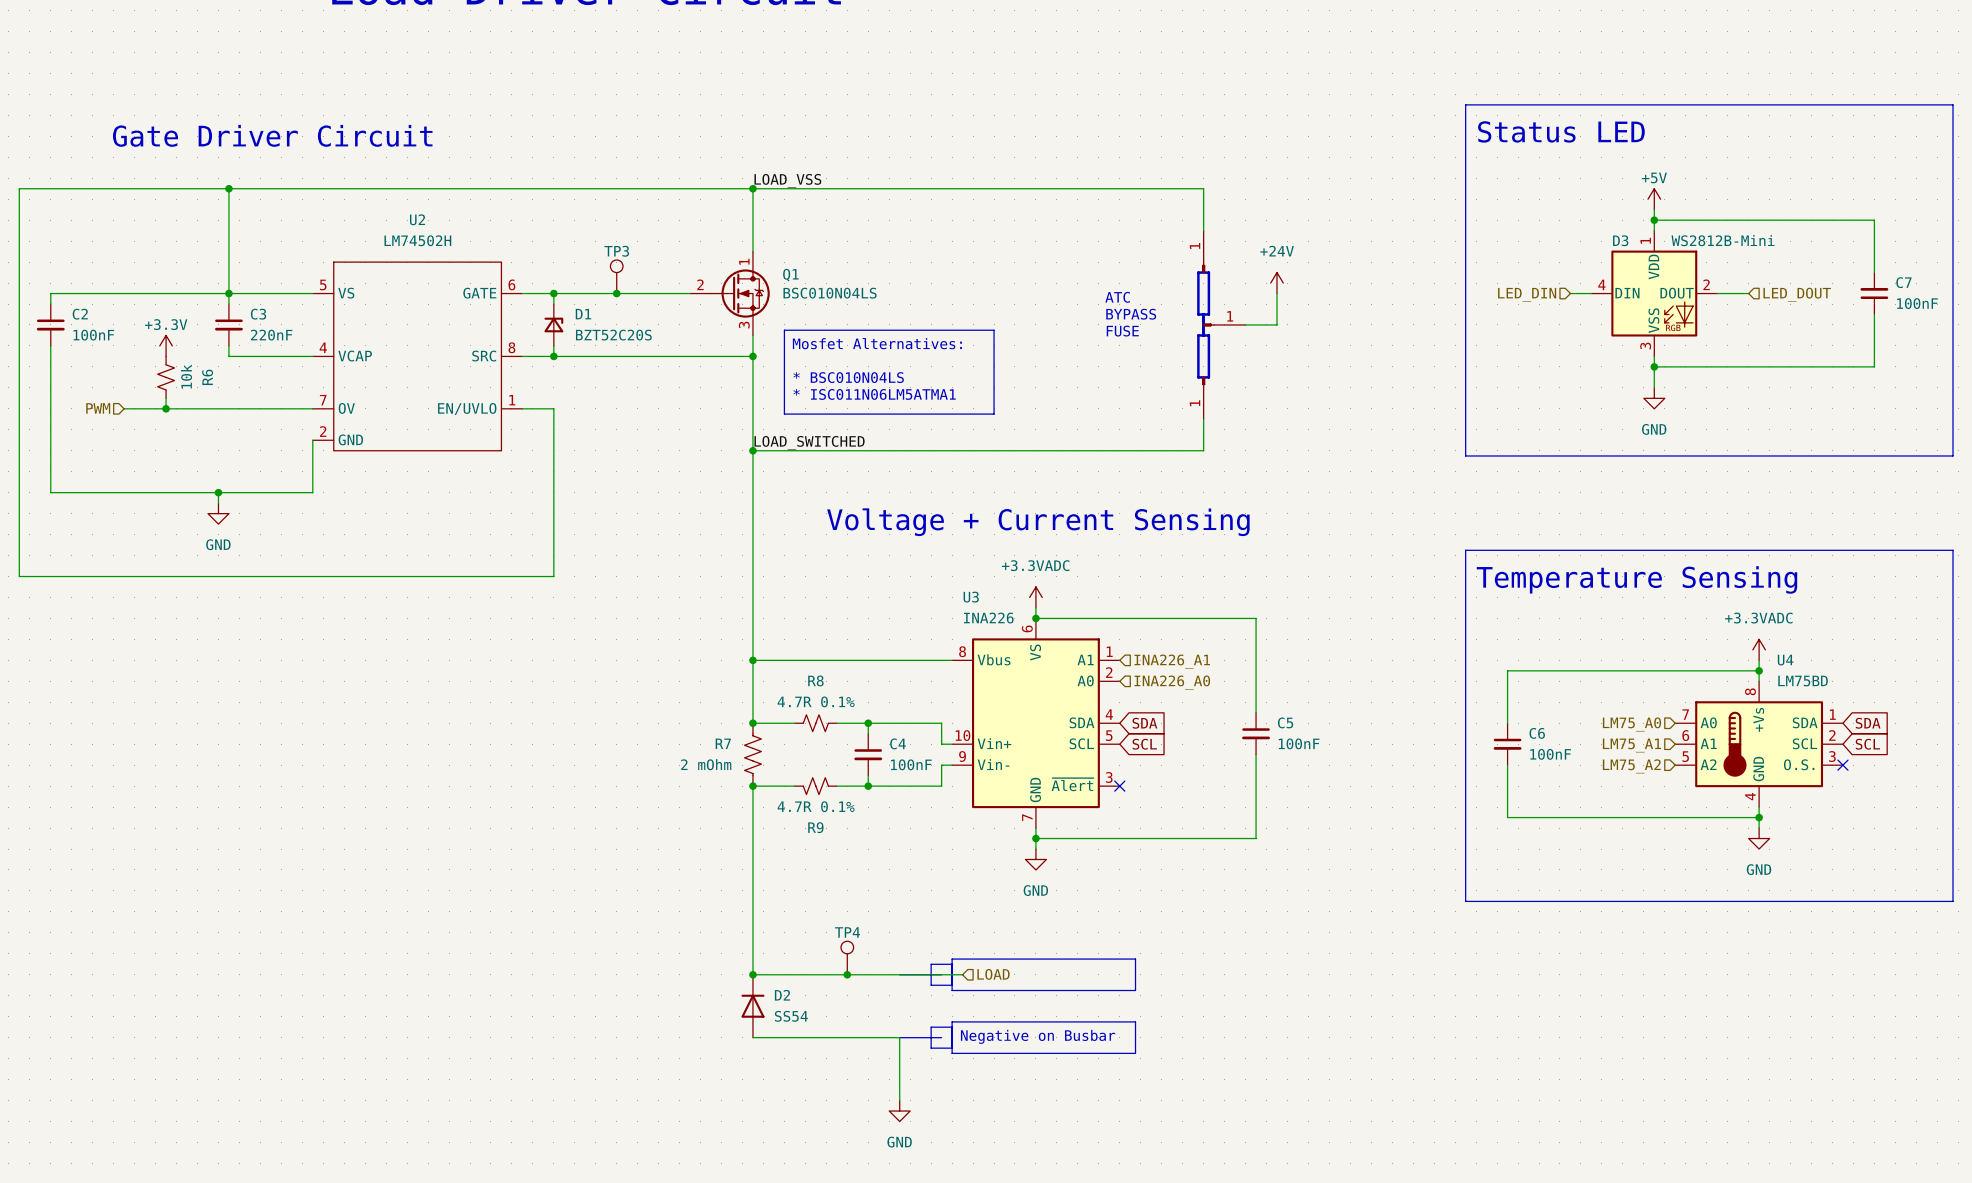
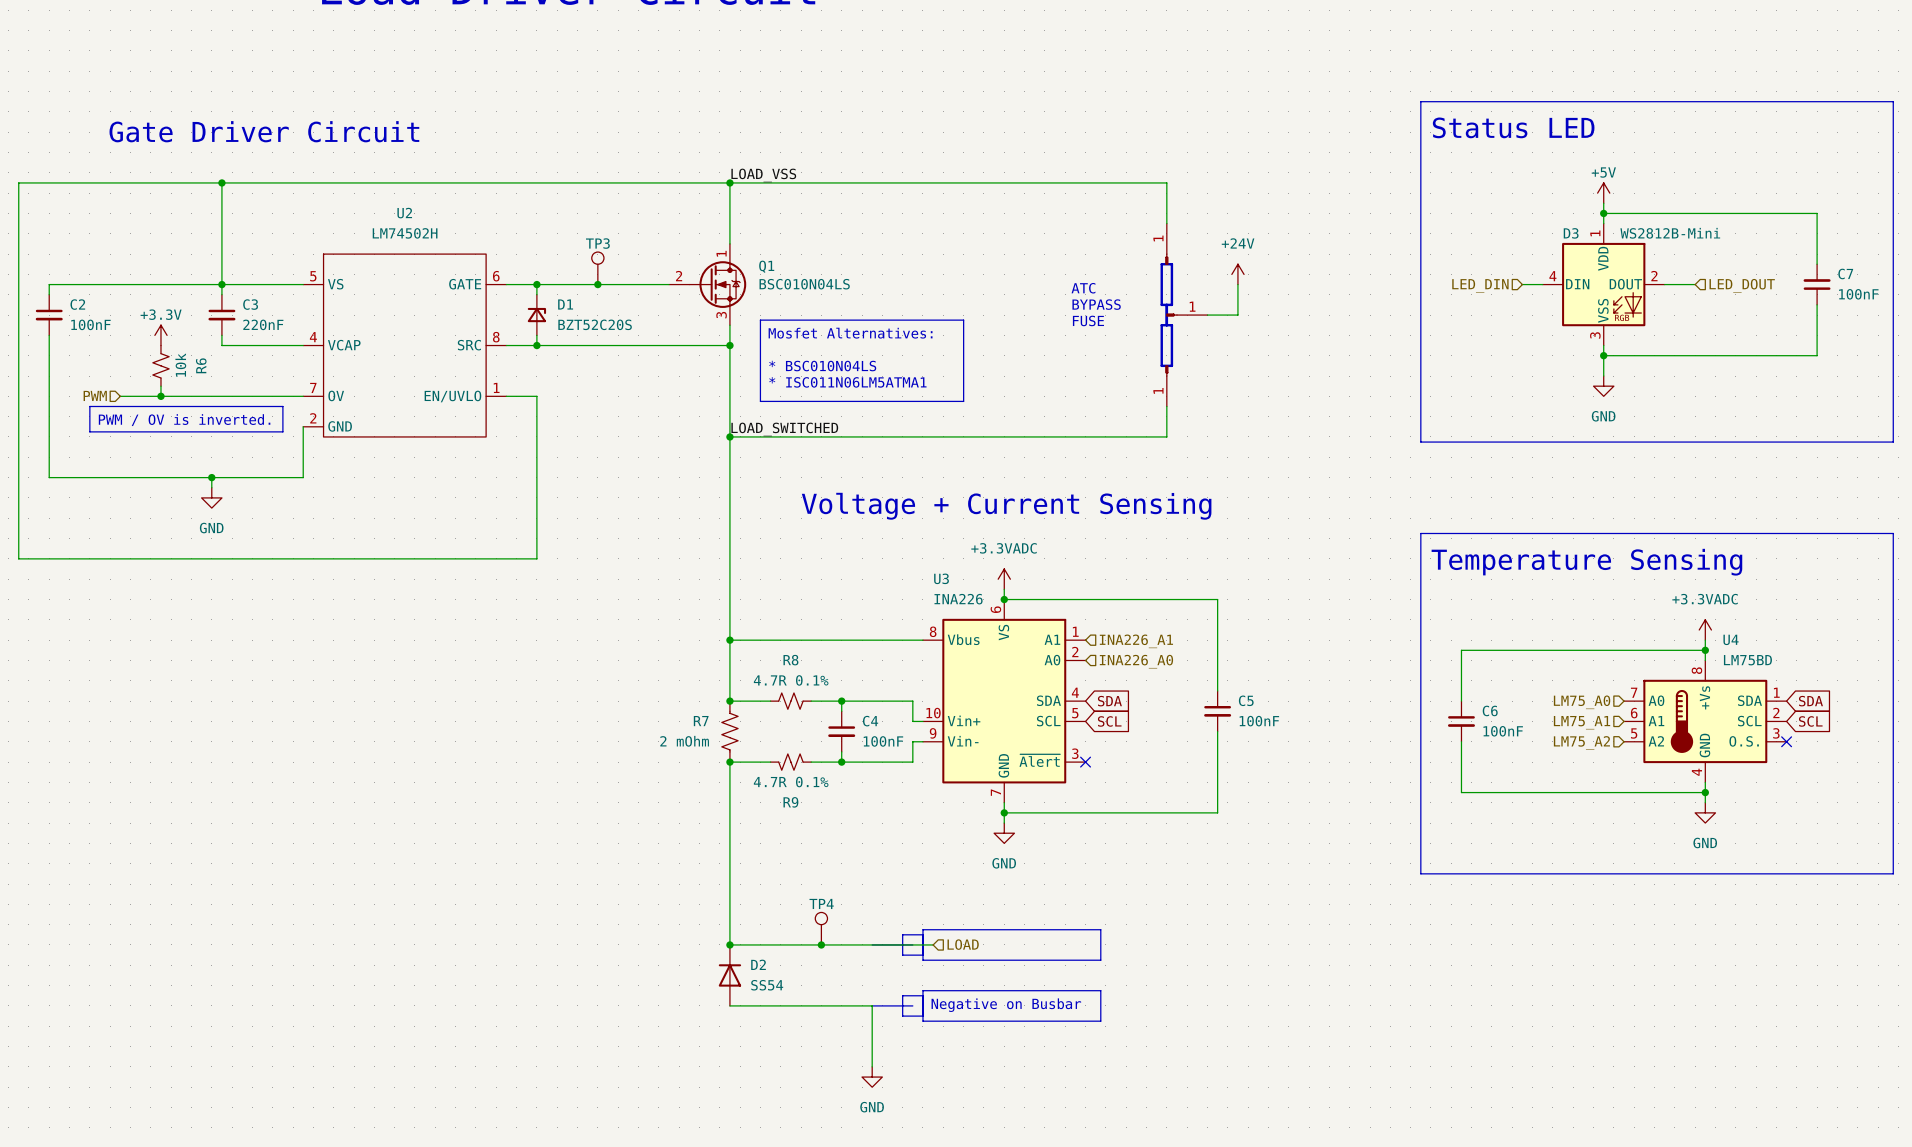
line: none -> (89, 406) (282, 406) (282, 431) (89, 431) (89, 406)
text: none -> PWM / OV is inverted. (184, 420)

